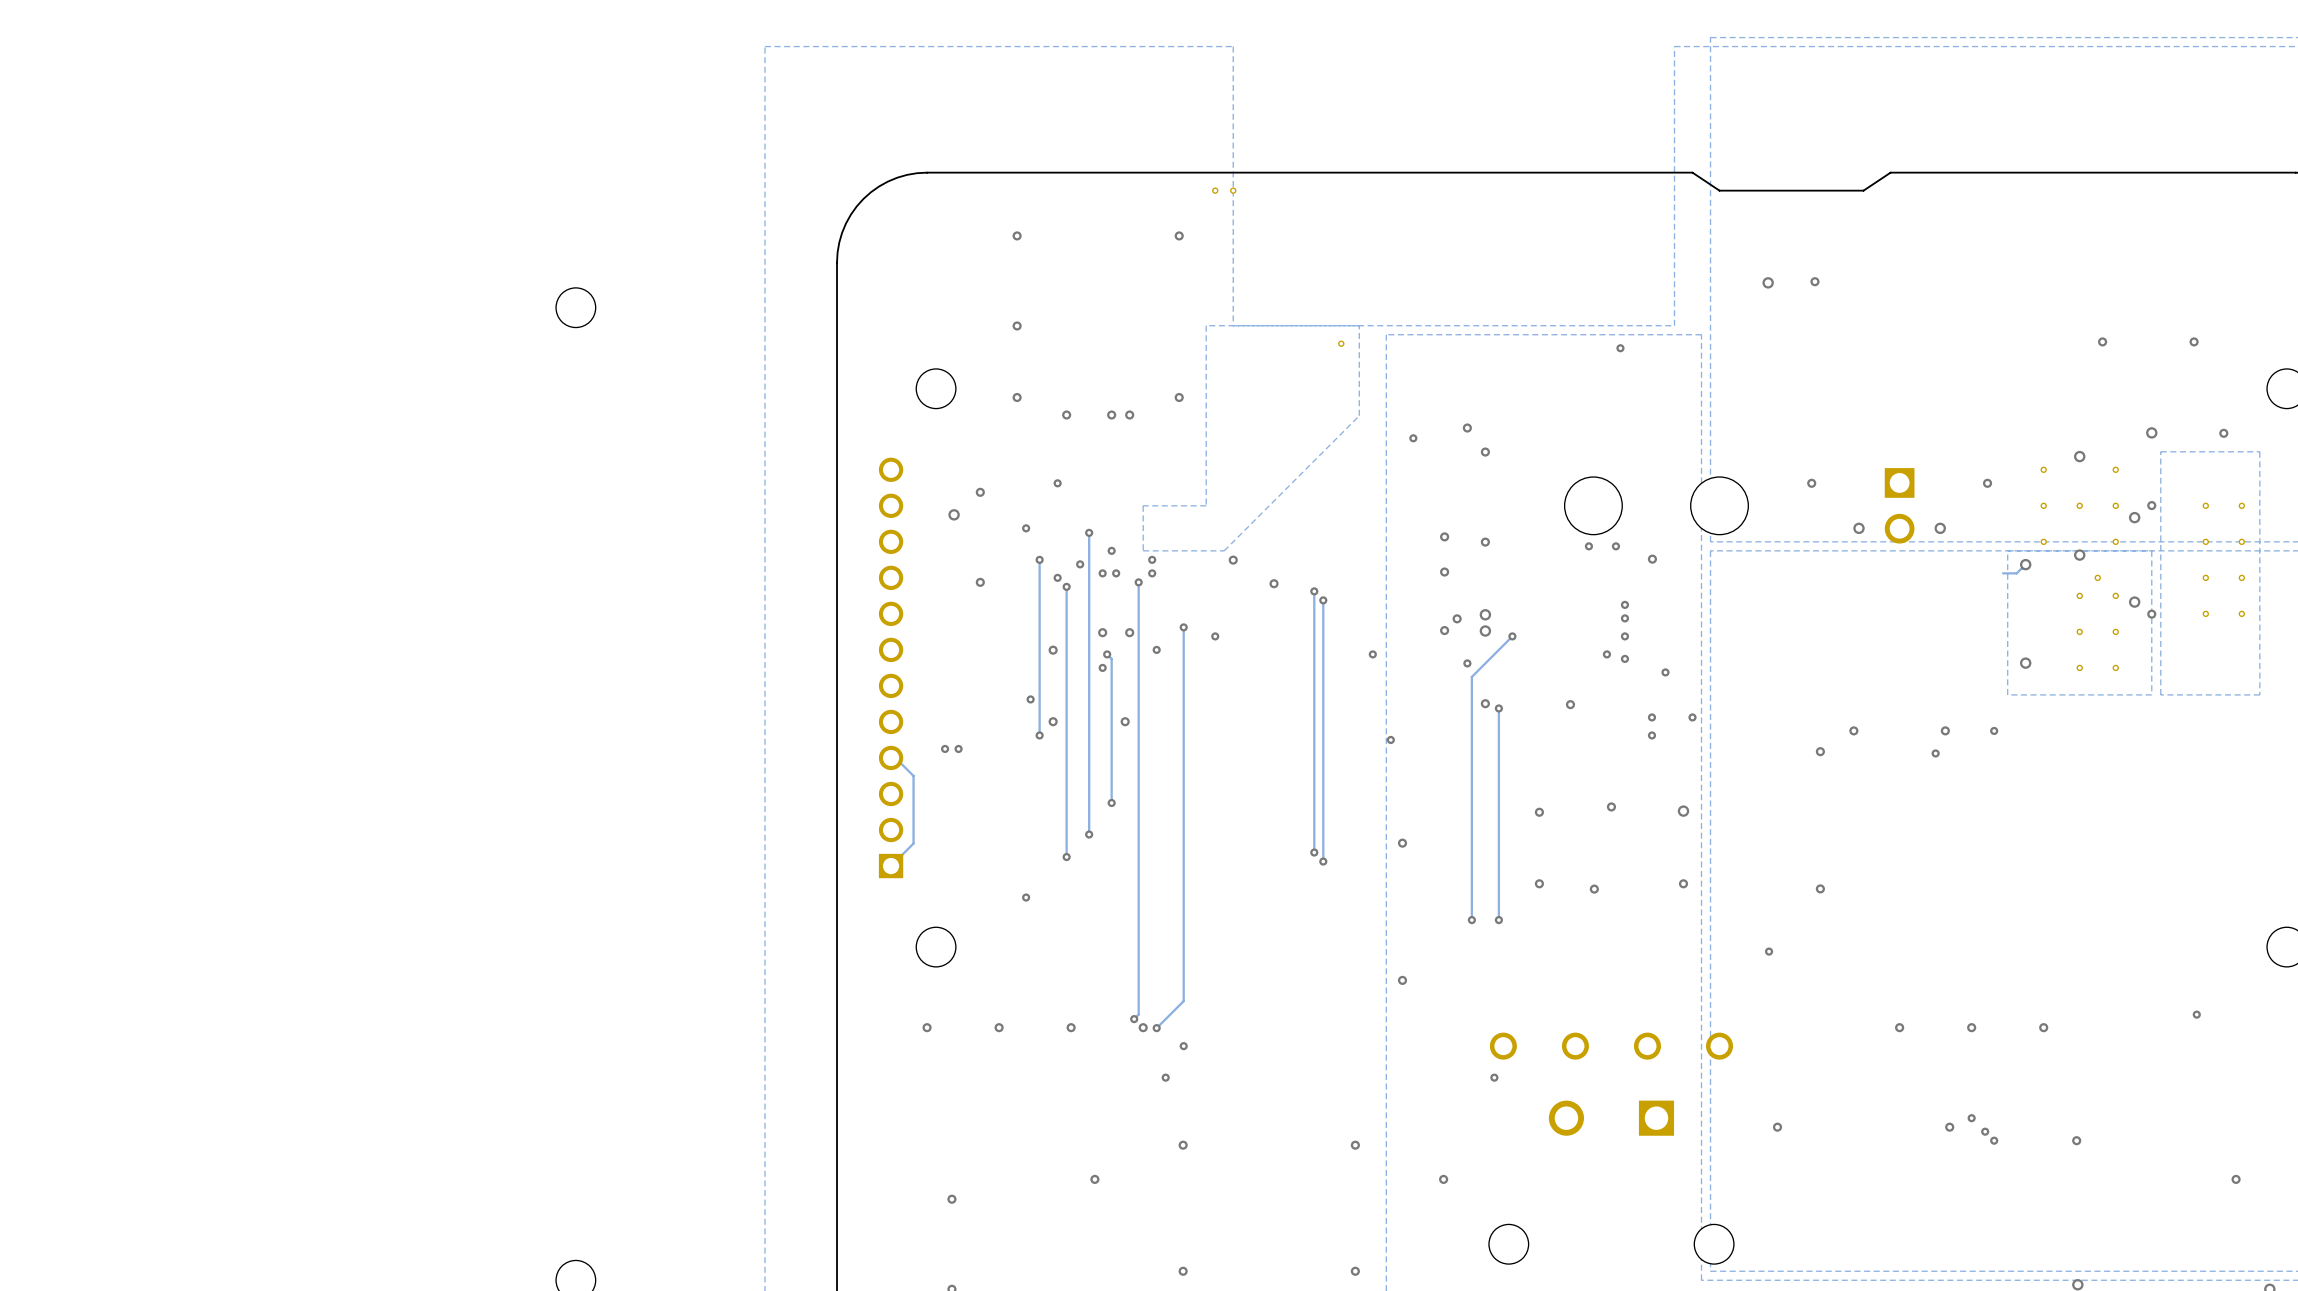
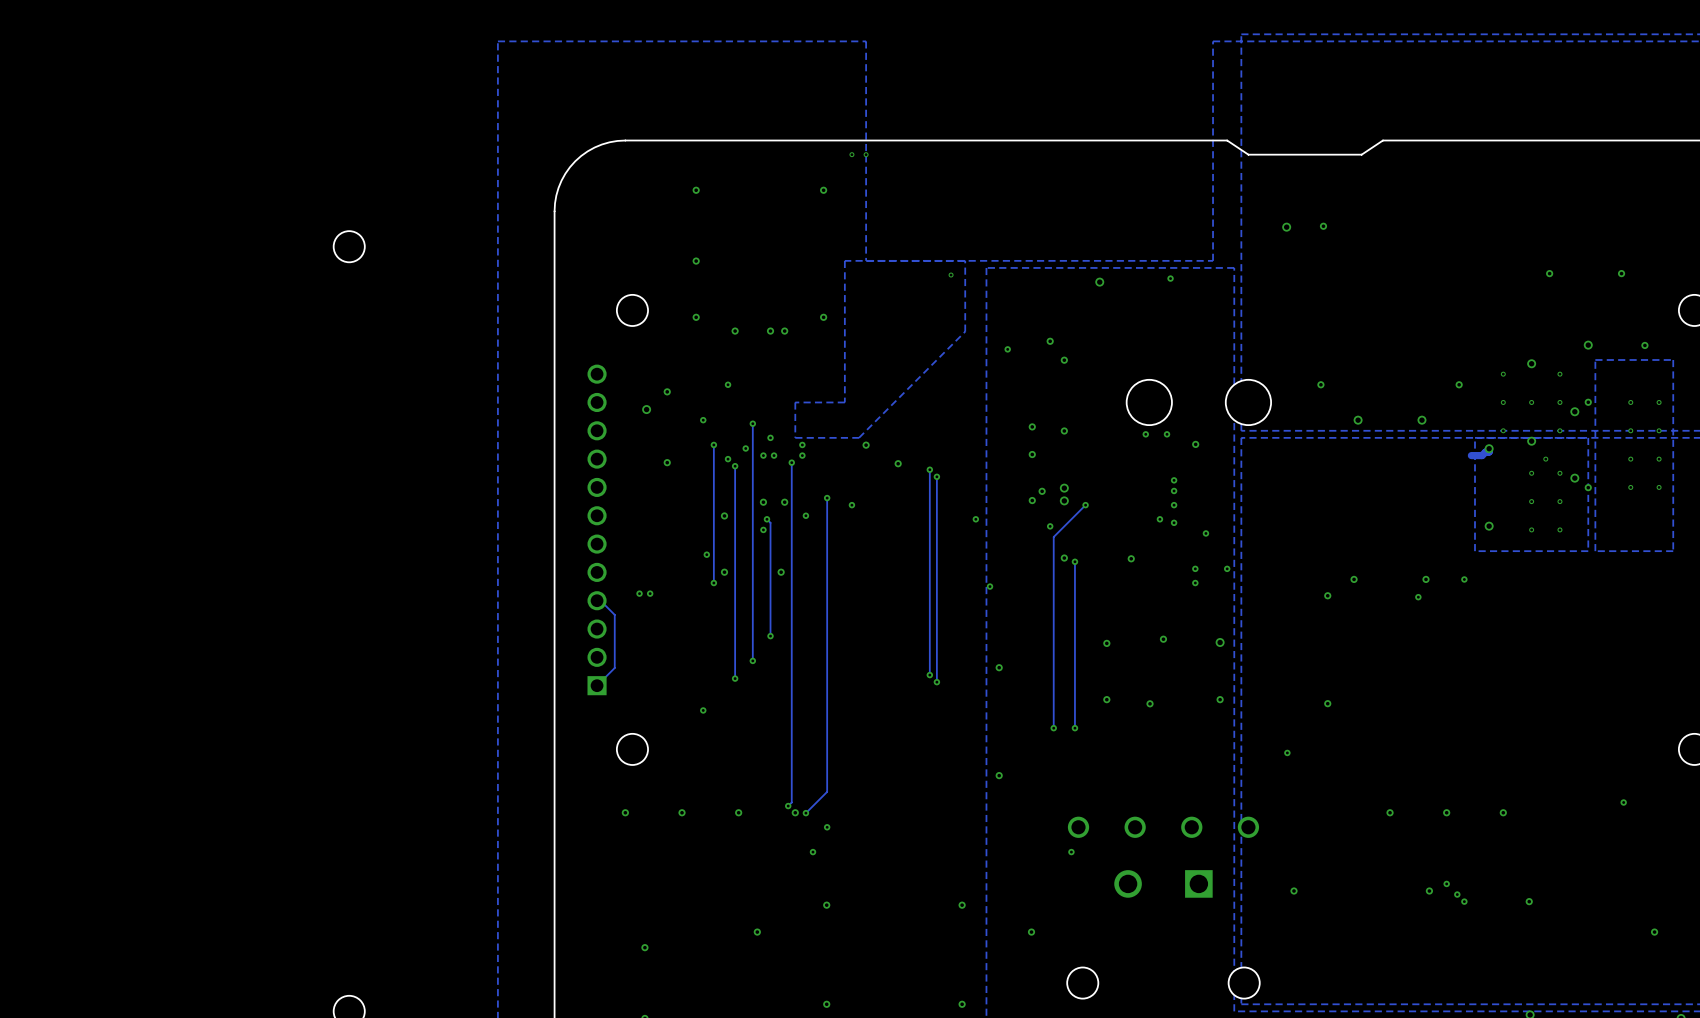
via: none -> (1099, 282)
part: (1899, 505) -> none
track width: thin (2025, 564) (2025, 568) (2021, 568) (2016, 573) (2003, 573) -> thick (1489, 448) (1489, 452) (1485, 452) (1482, 455) (1471, 455)

